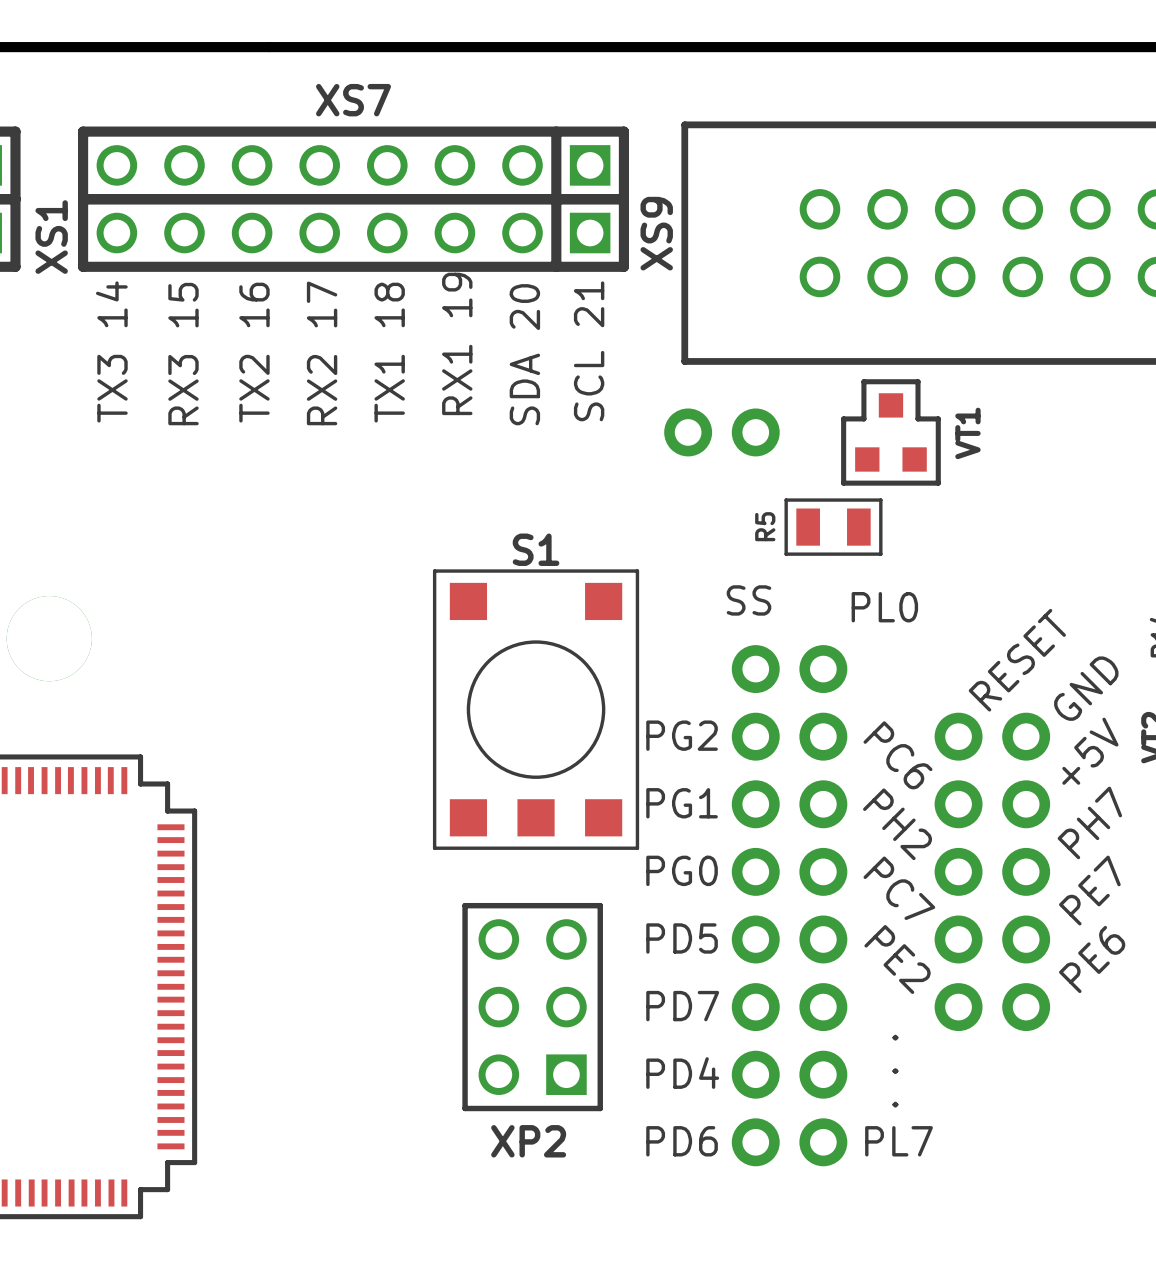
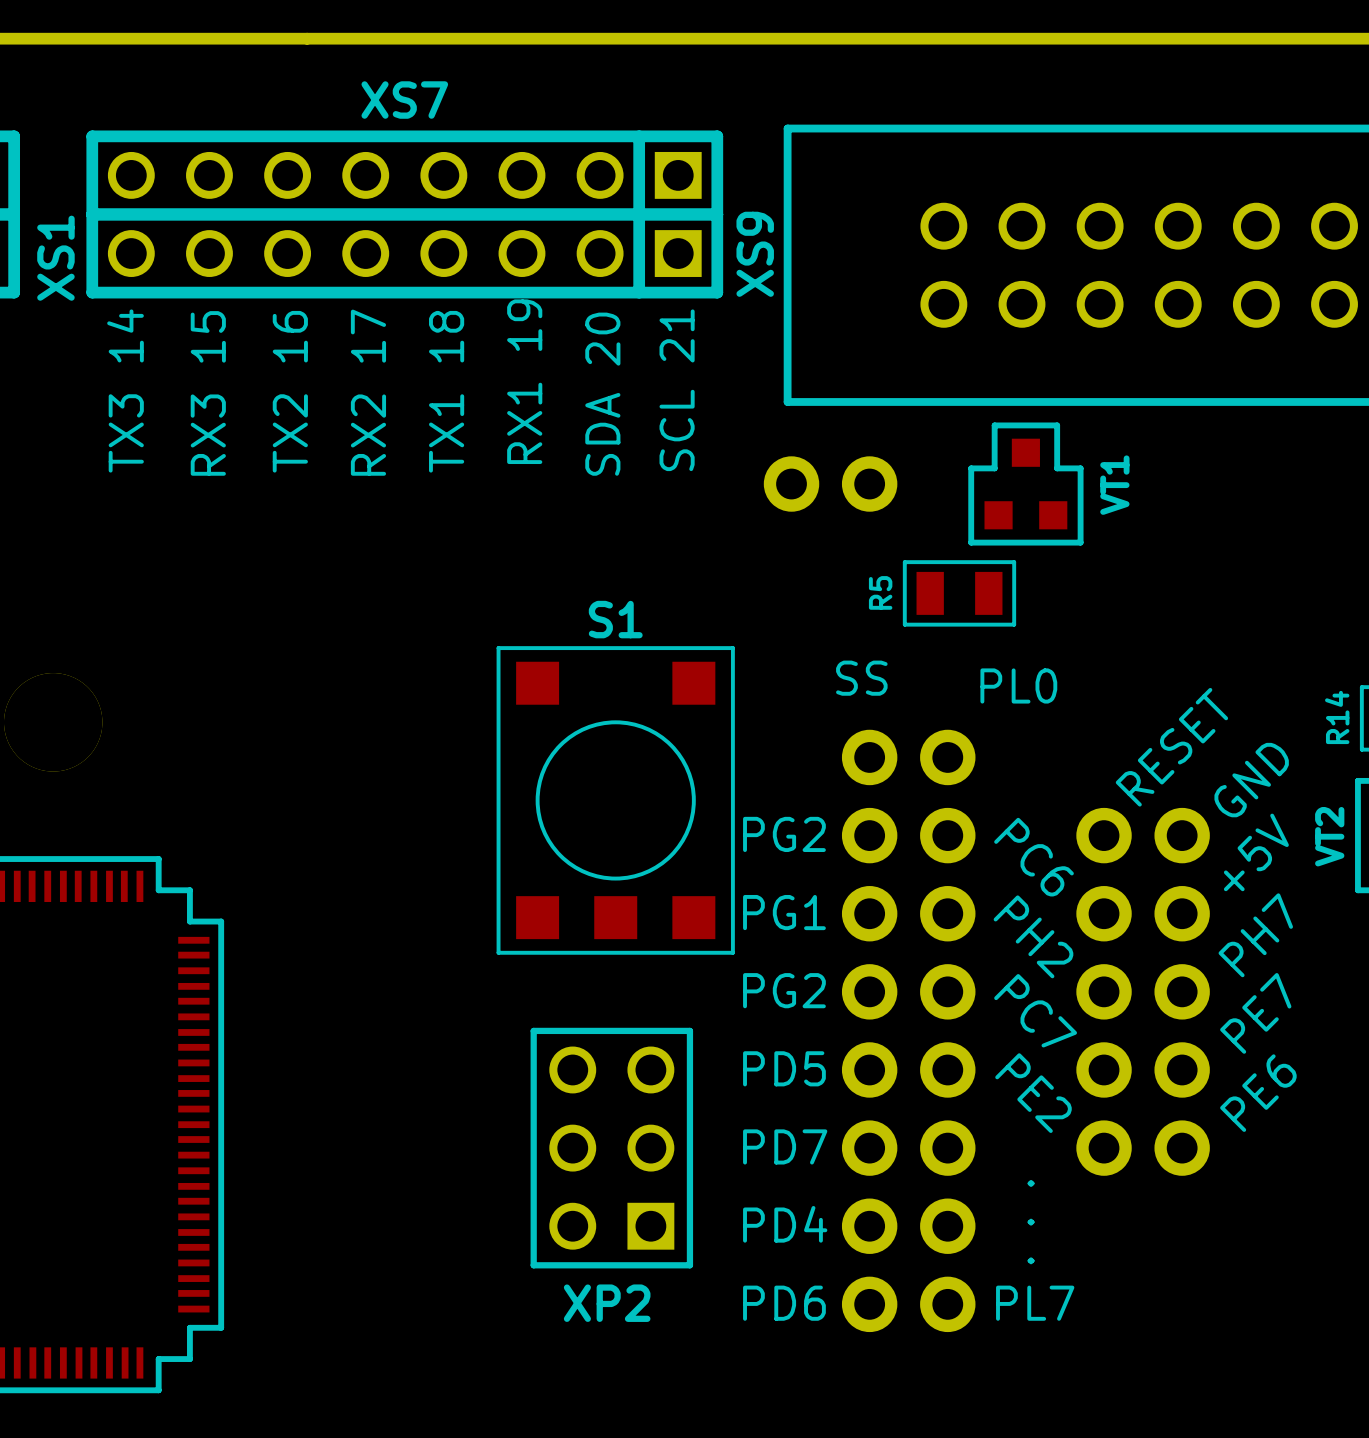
S1 footprint: [432, 569, 640, 850] -> [496, 646, 735, 955]
text: PG0 (682, 870) -> PG2 (784, 990)

